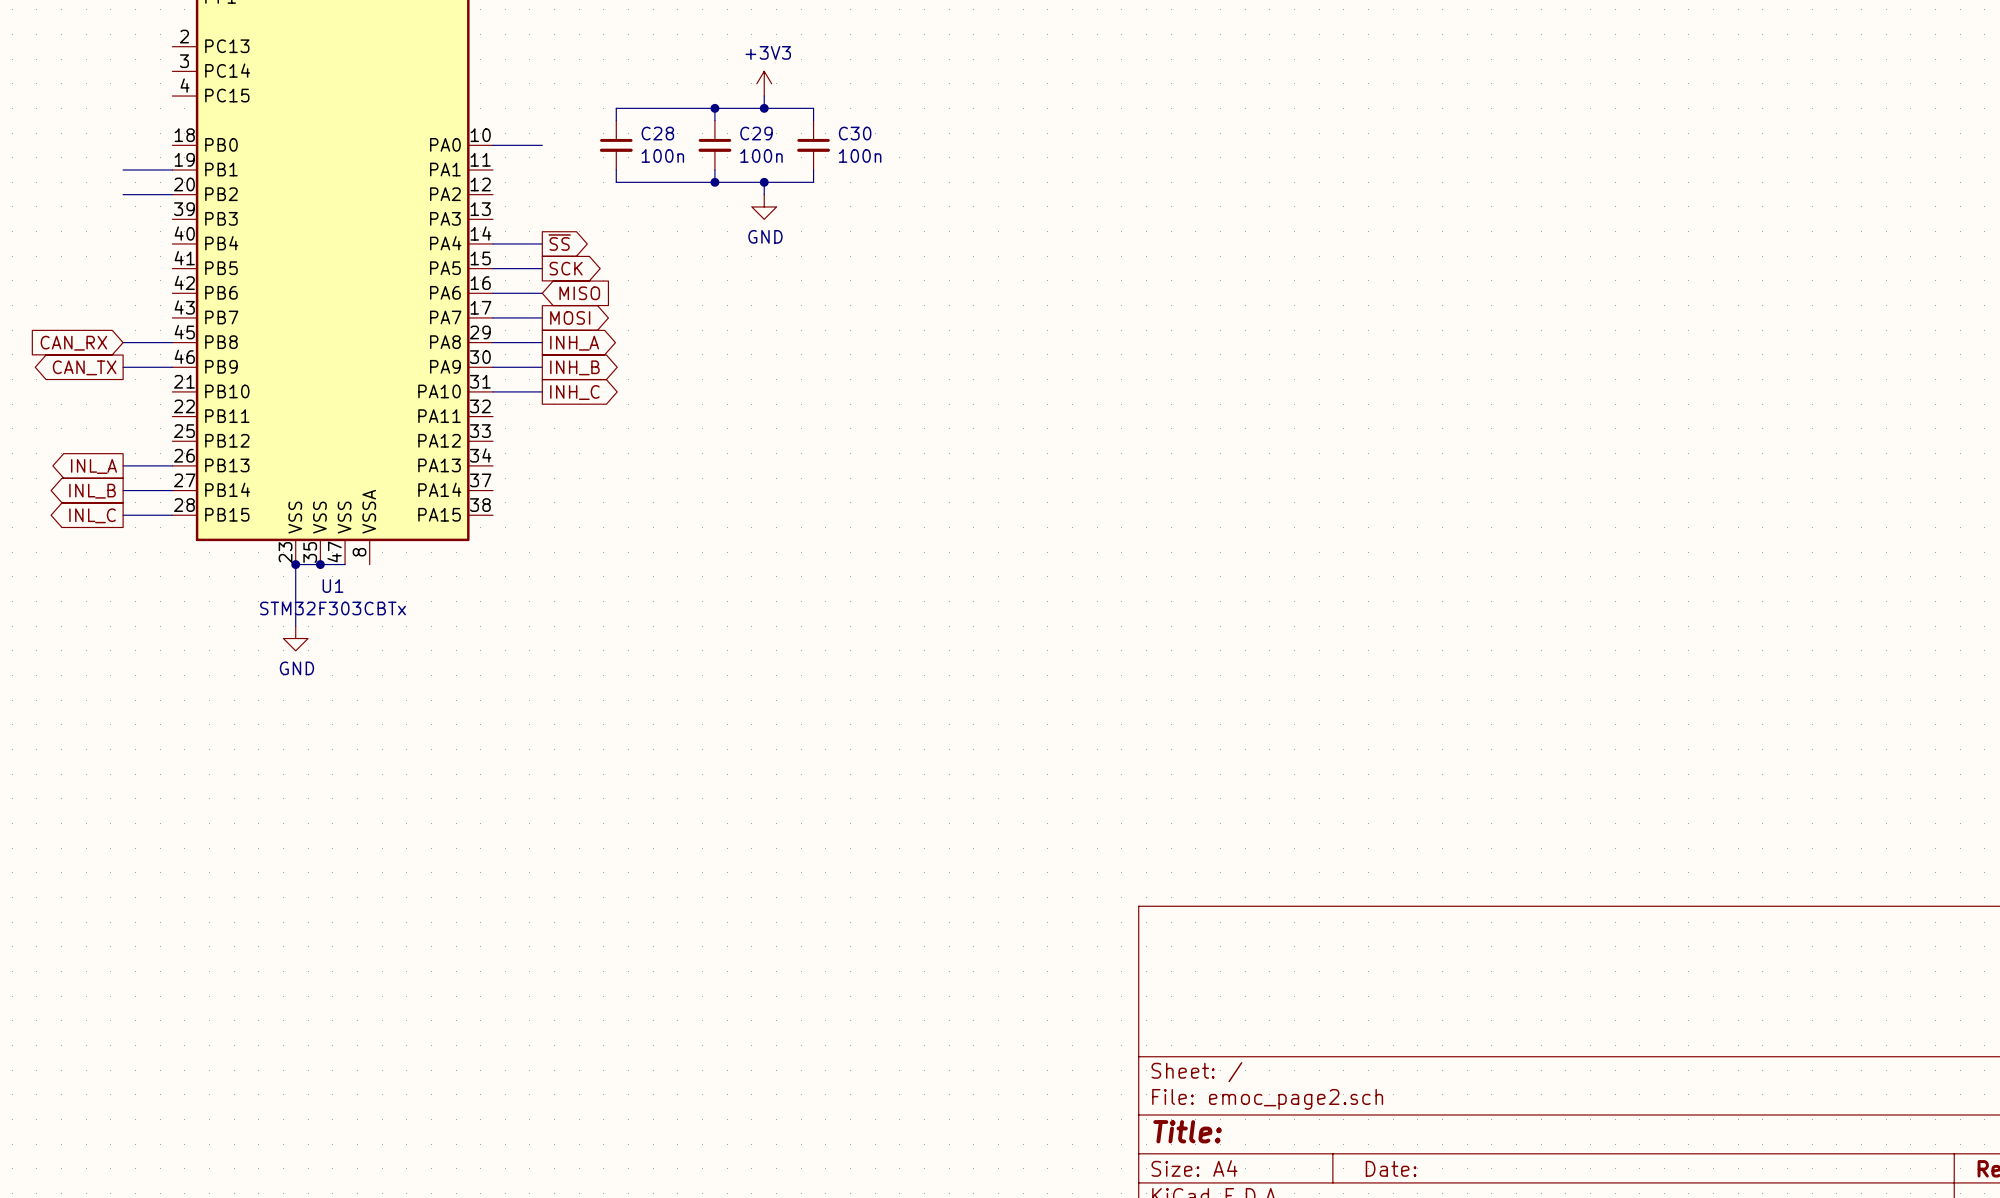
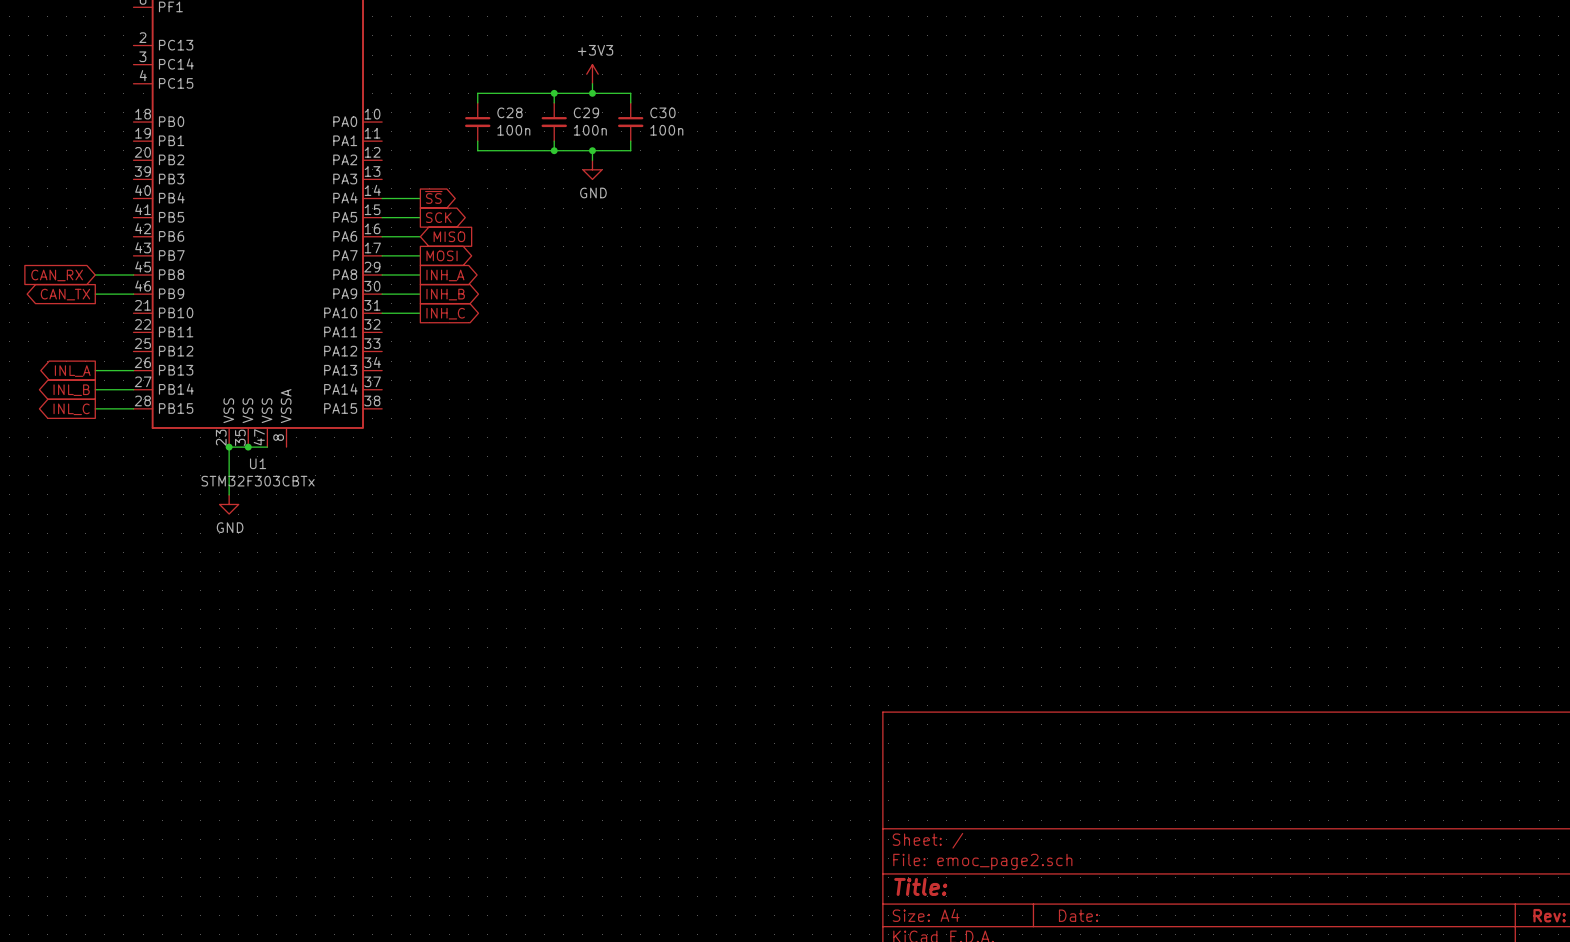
wire: (492, 145) (542, 145) -> none
wire: (123, 170) (172, 170) -> none
wire: (123, 194) (172, 194) -> none

